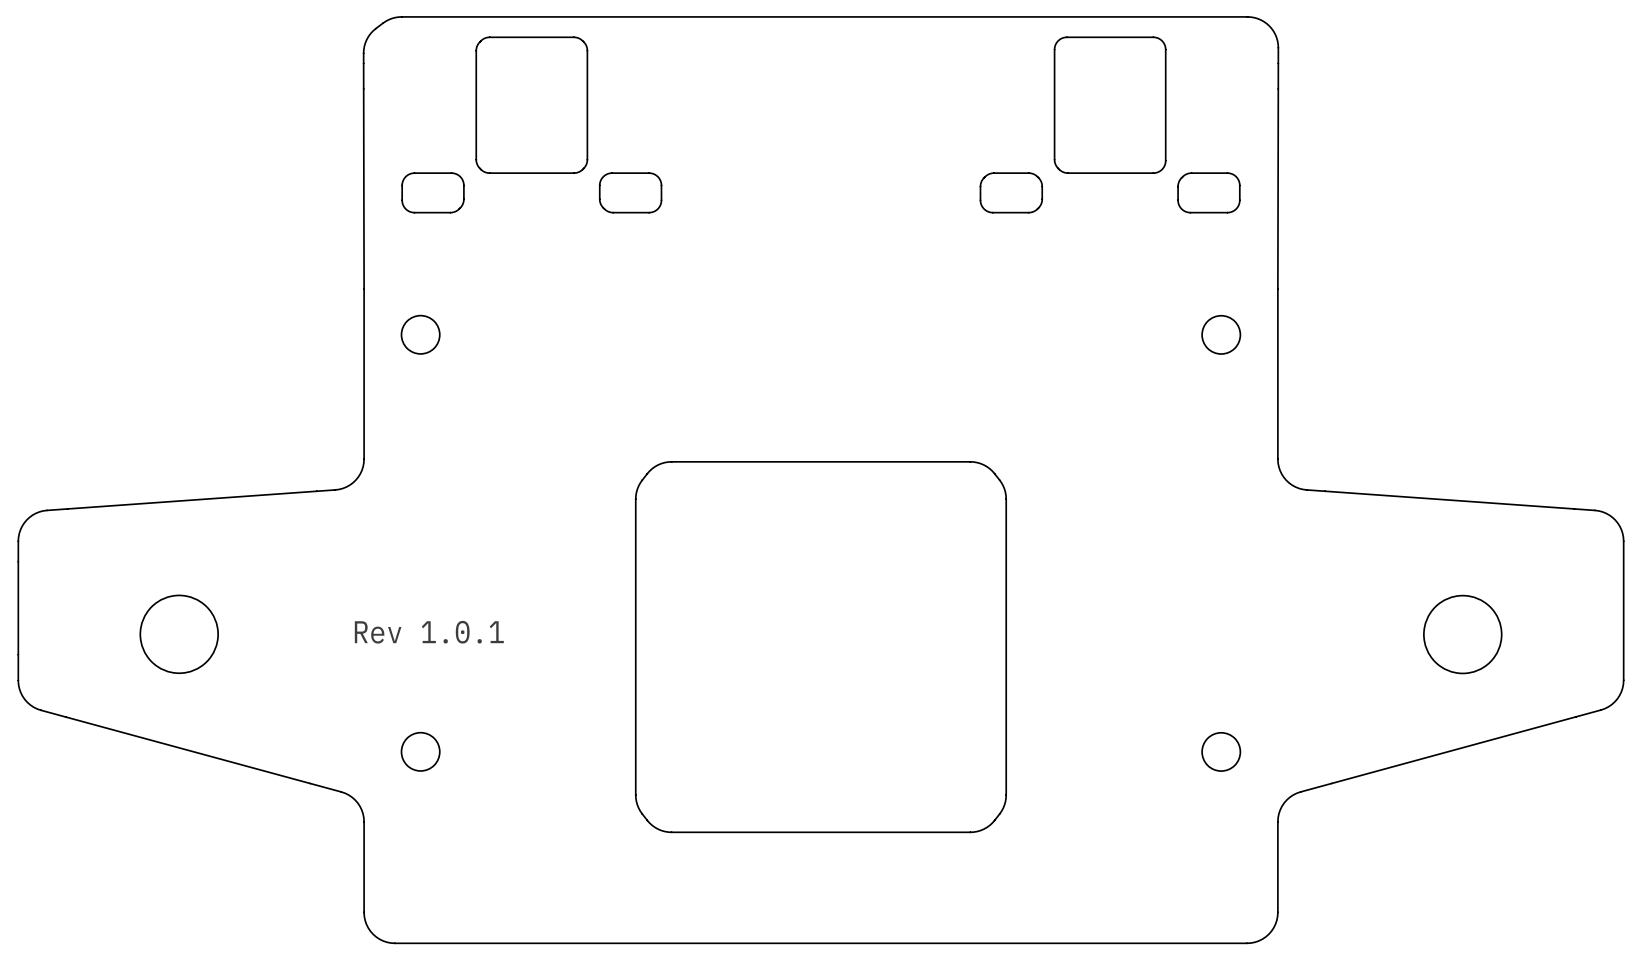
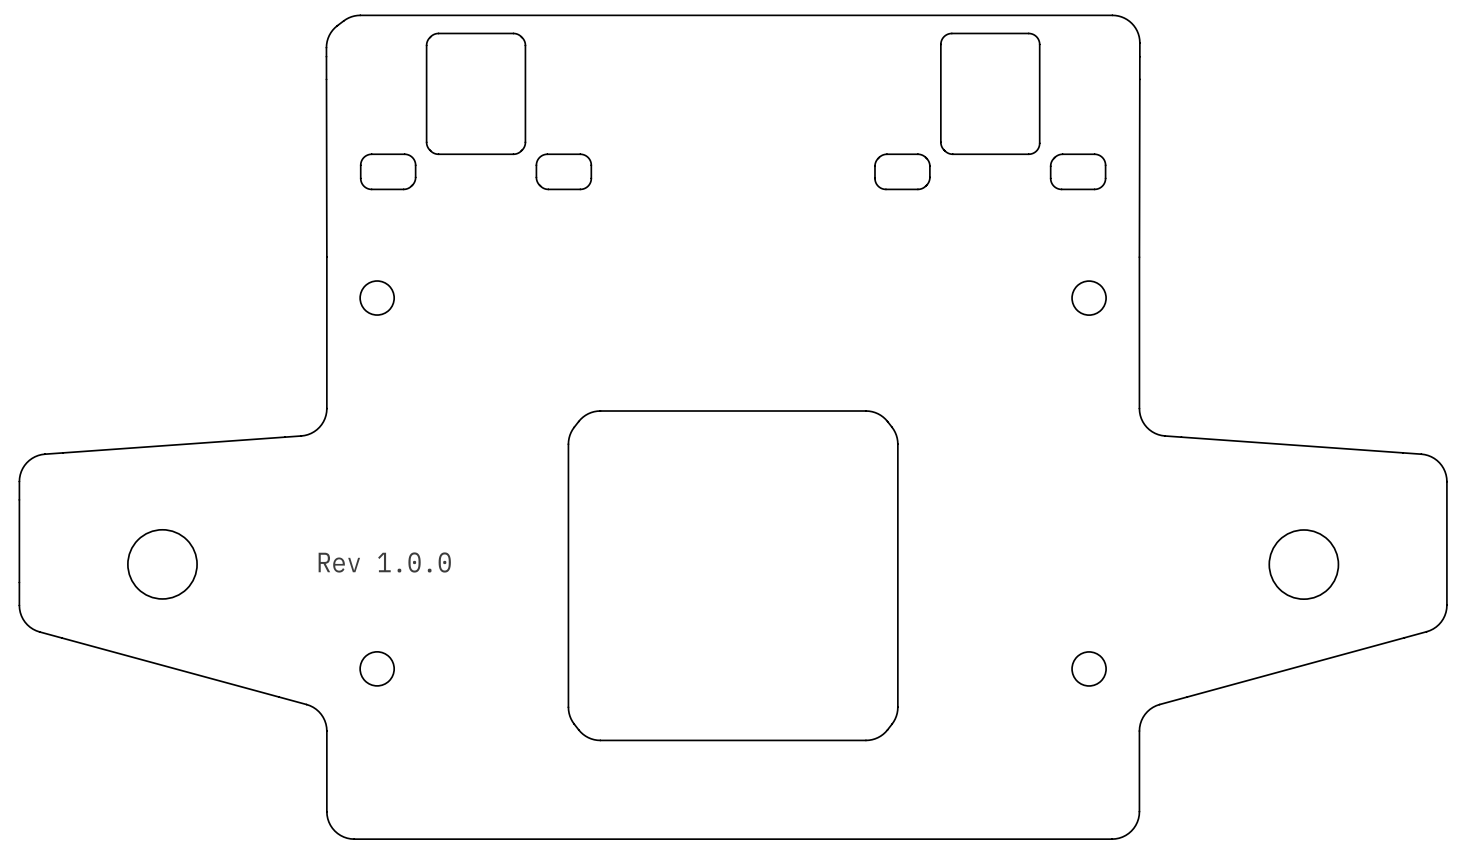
text: Rev 1.0.1 (429, 632) -> Rev 1.0.0 (384, 562)

